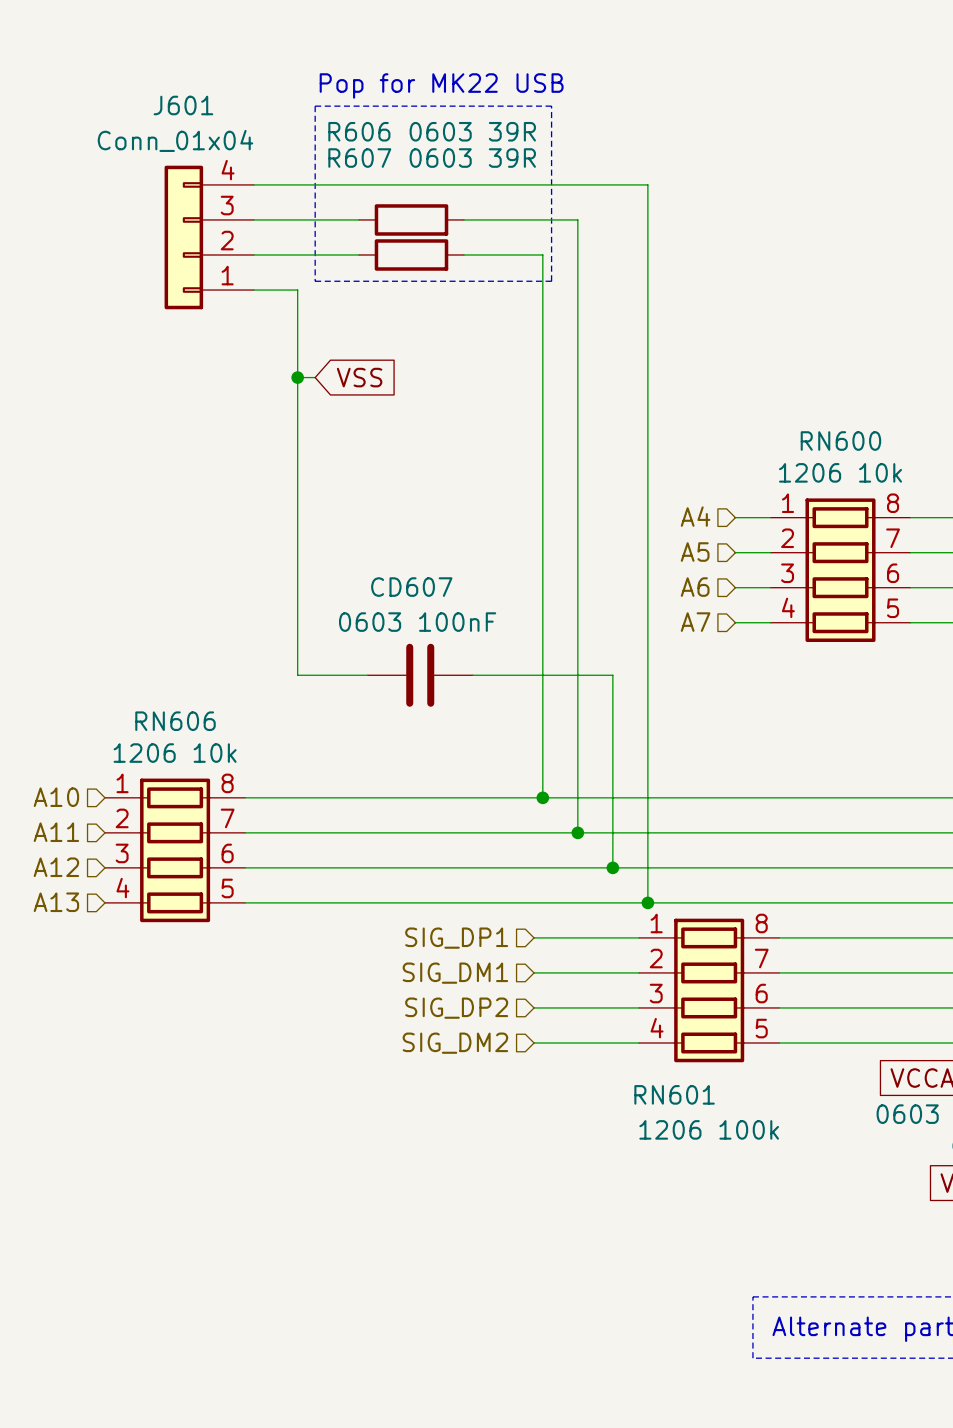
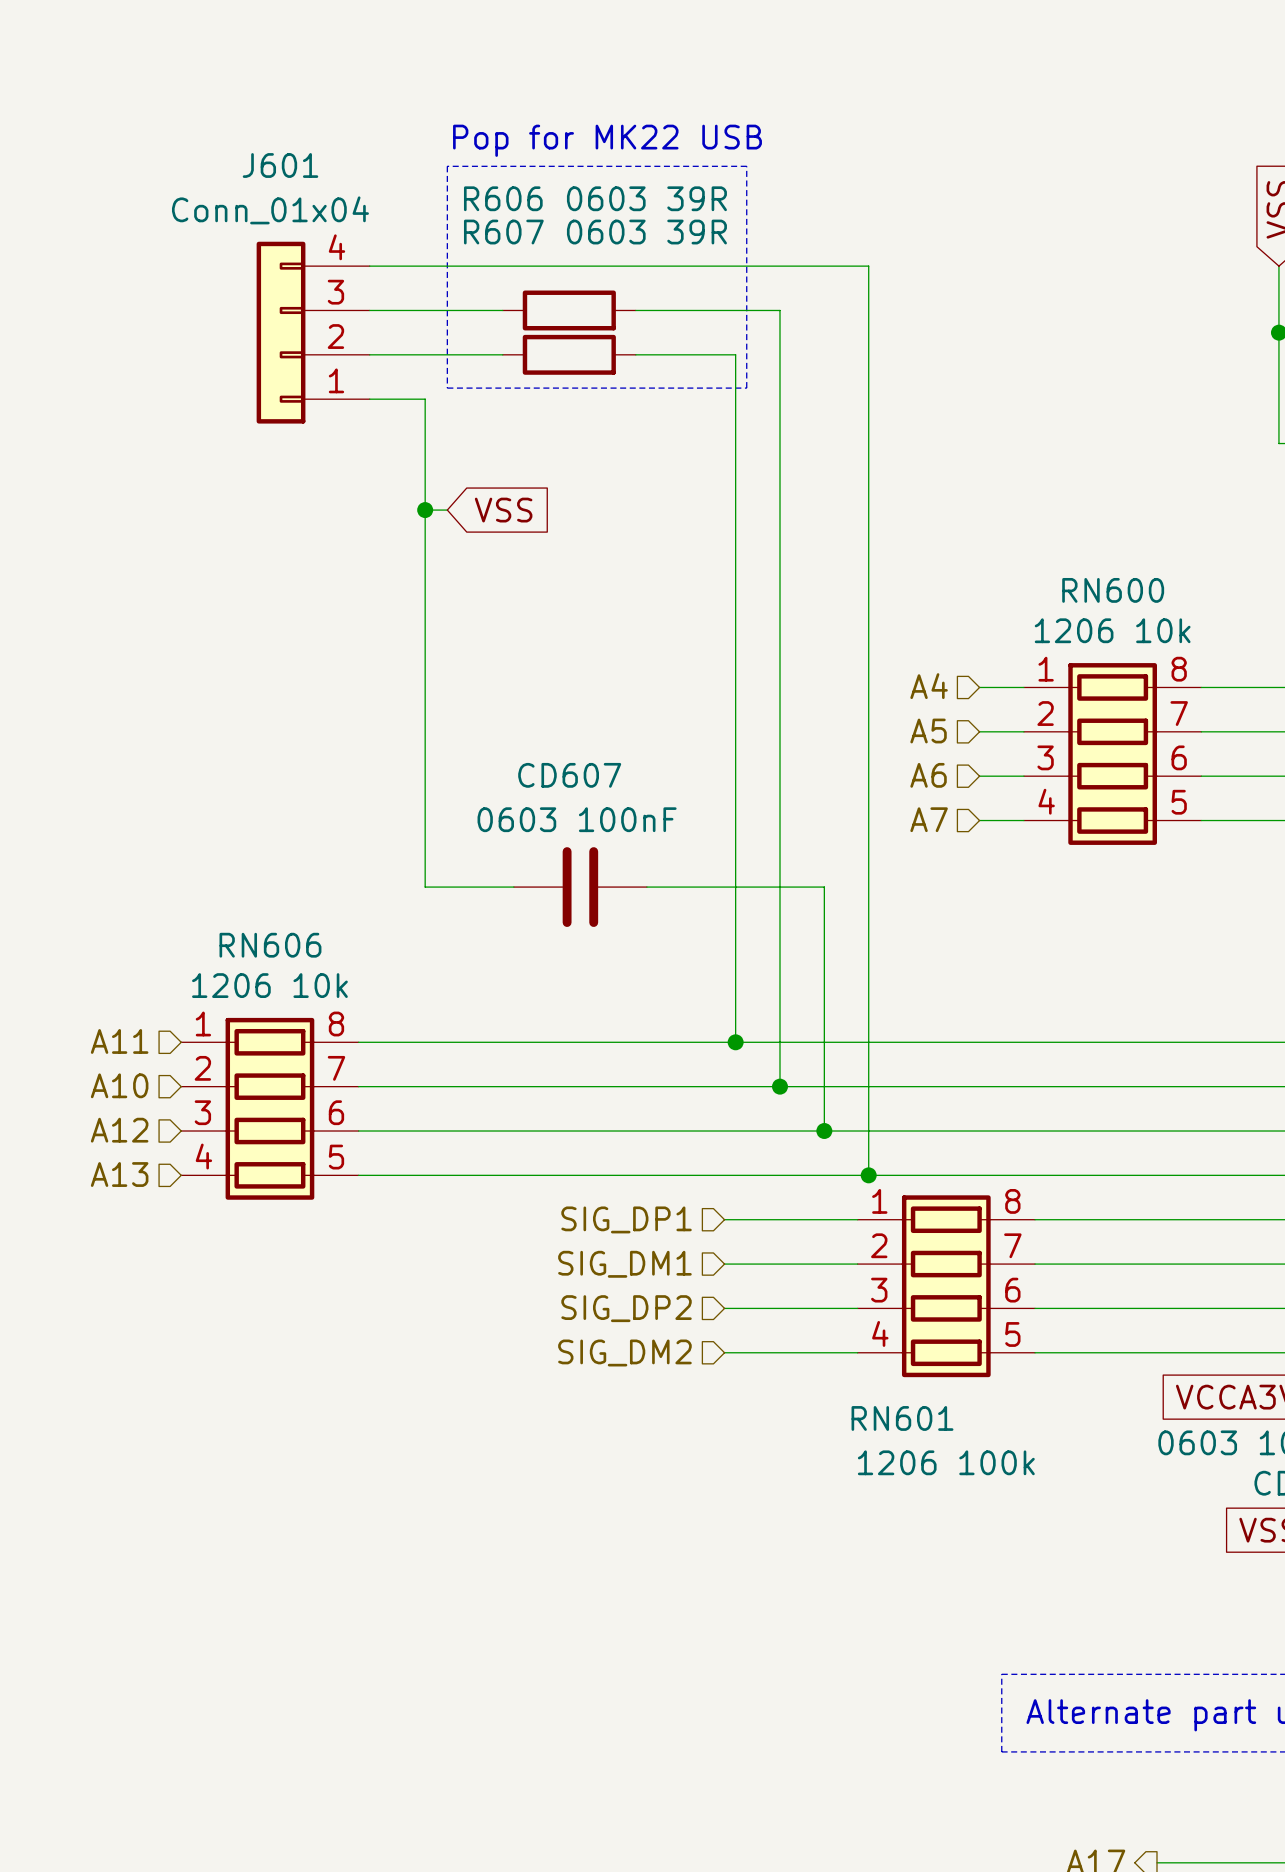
hierarchical label: A10 (56, 797) -> A11 (119, 1041)
hierarchical label: A11 (56, 832) -> A10 (119, 1085)

